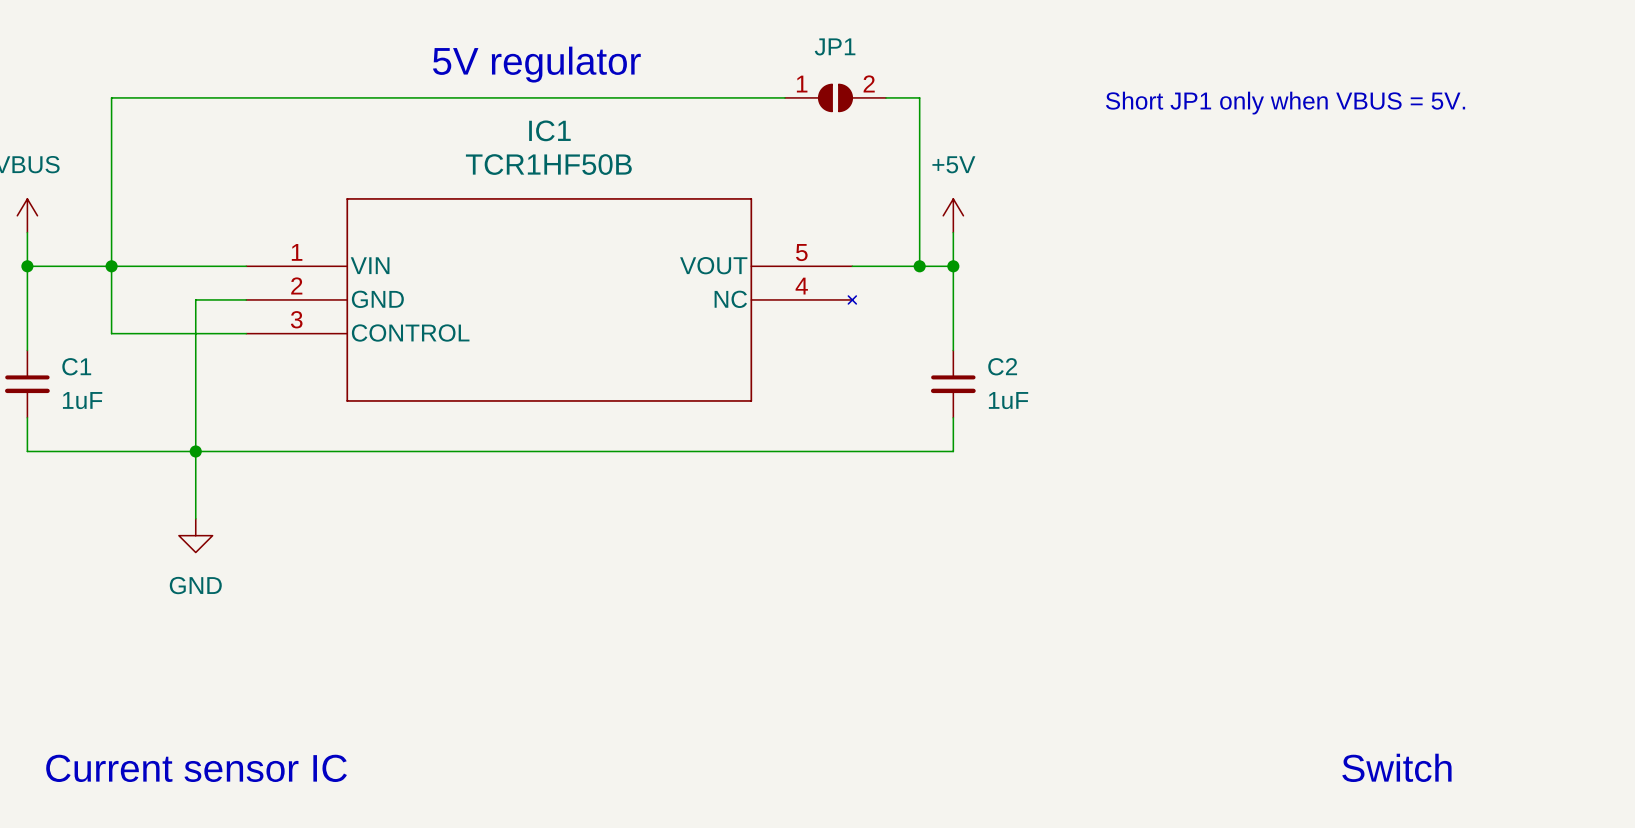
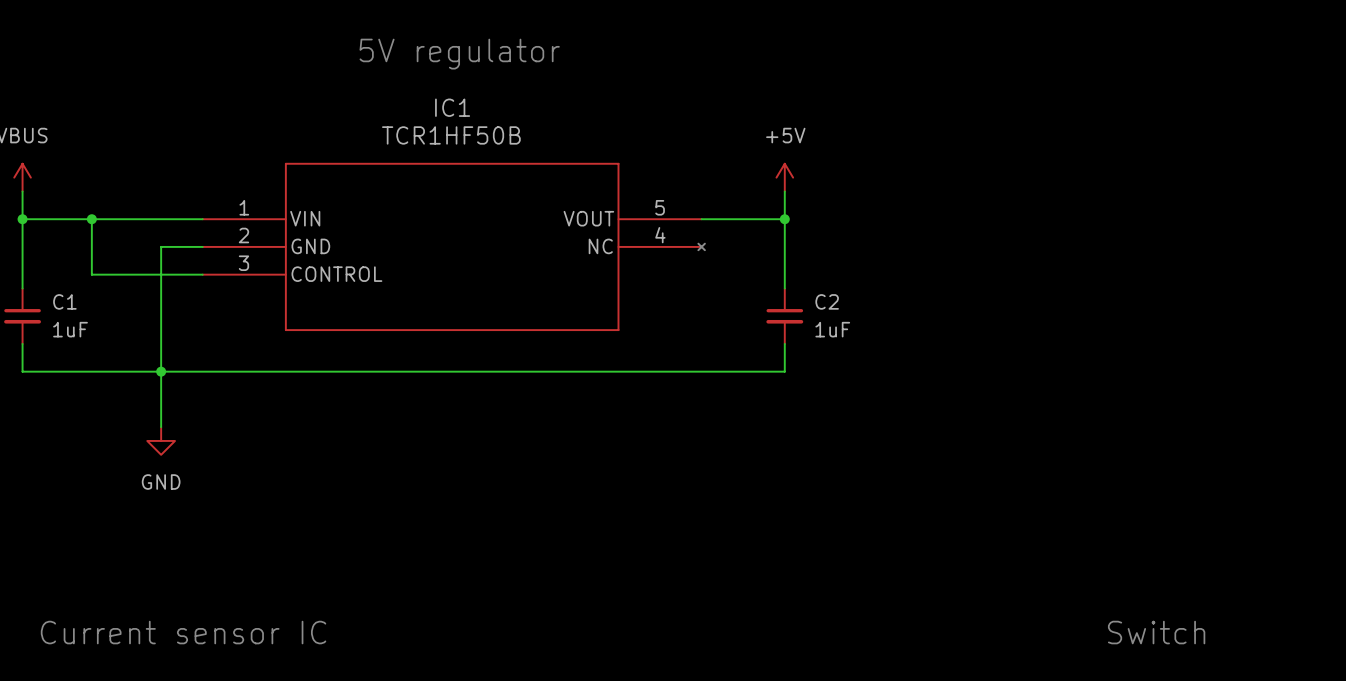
wire: (784, 97) (111, 97) (111, 266) -> none
JP1: (835, 97) -> none
wire: (886, 97) (919, 97) (919, 266) -> none
text: Short JP1 only when VBUS = 5V. (1285, 103) -> none
junction: (919, 266) -> none

